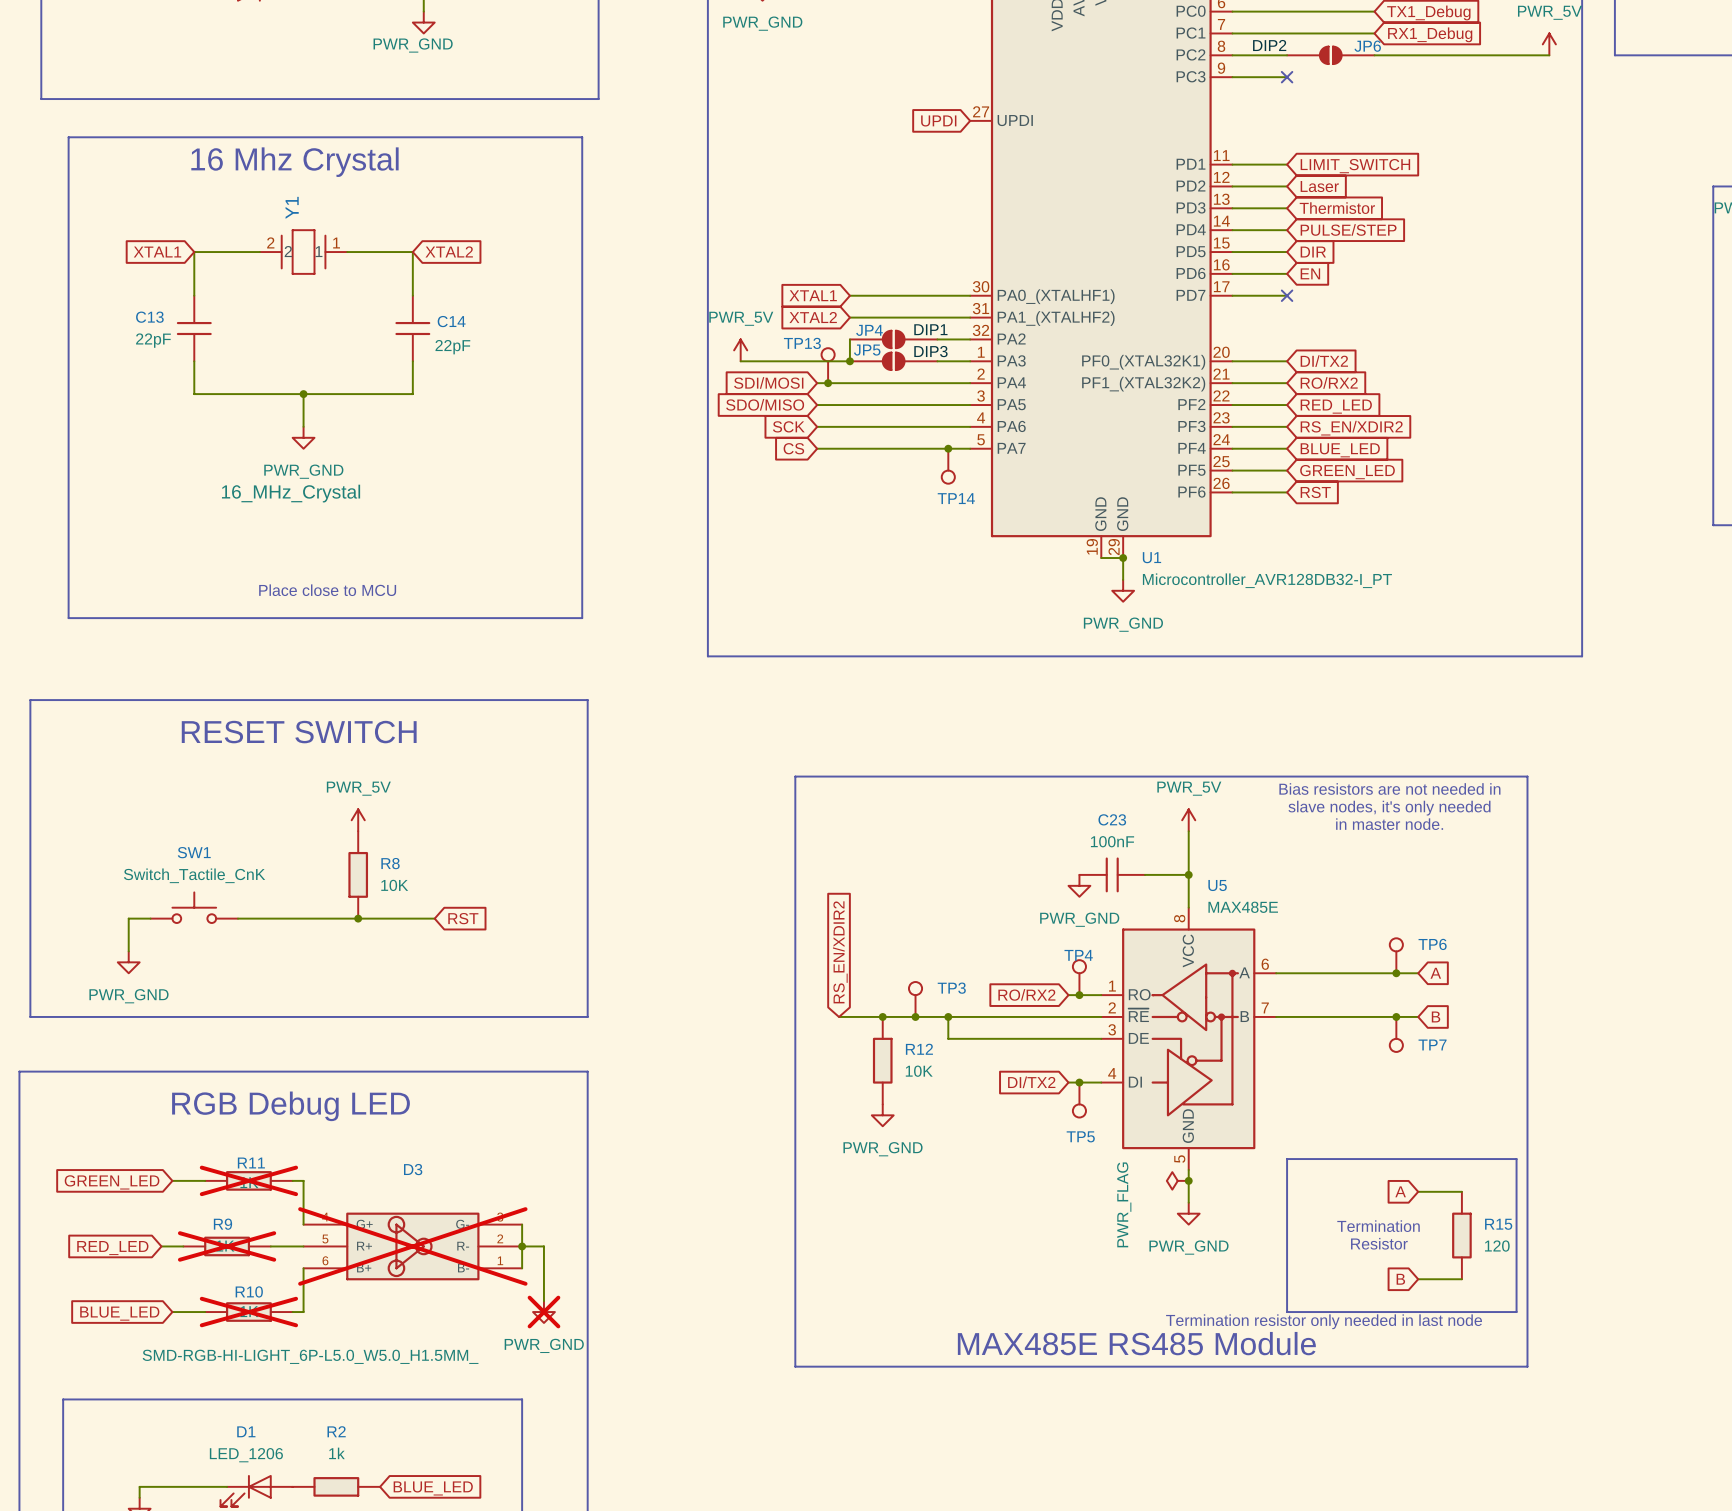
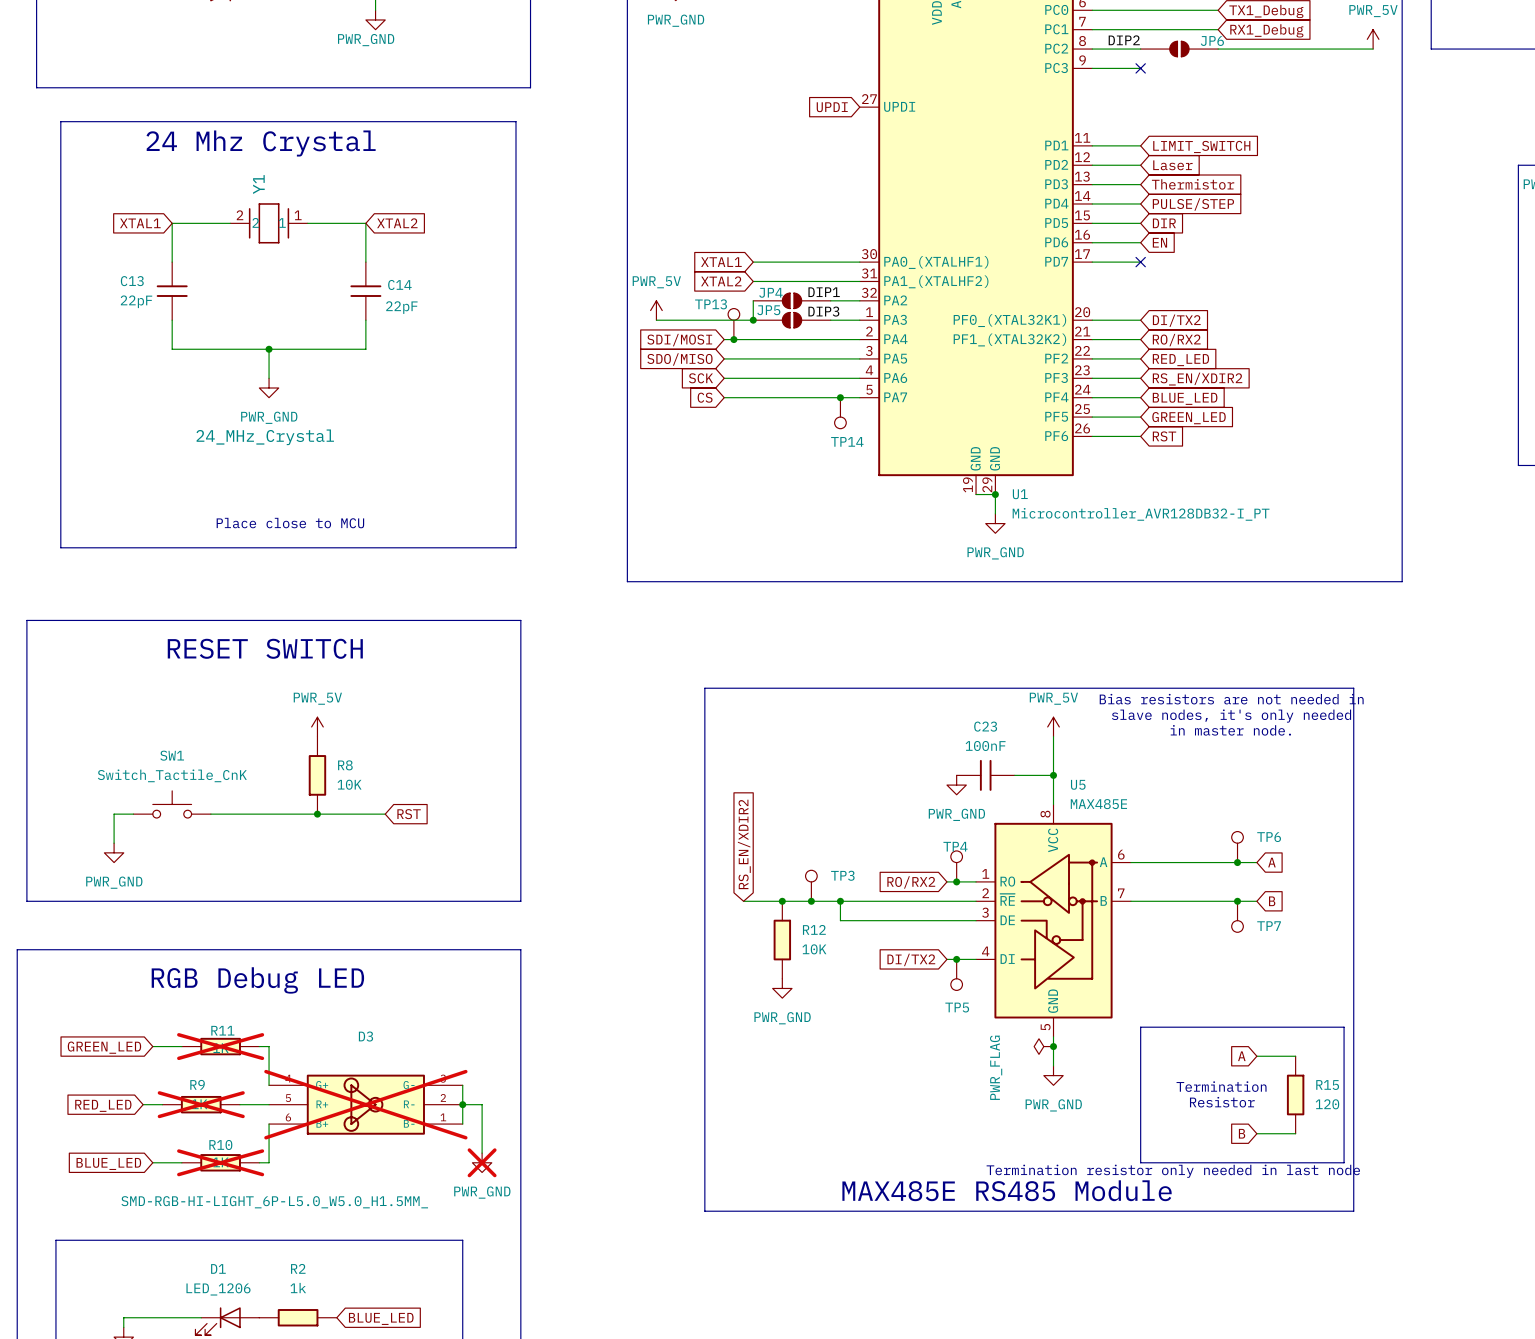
text: 16 Mhz Crystal (294, 162) -> 24 Mhz Crystal (261, 143)
Y1 value: 16_MHz_Crystal (291, 493) -> 24_MHz_Crystal (265, 437)

